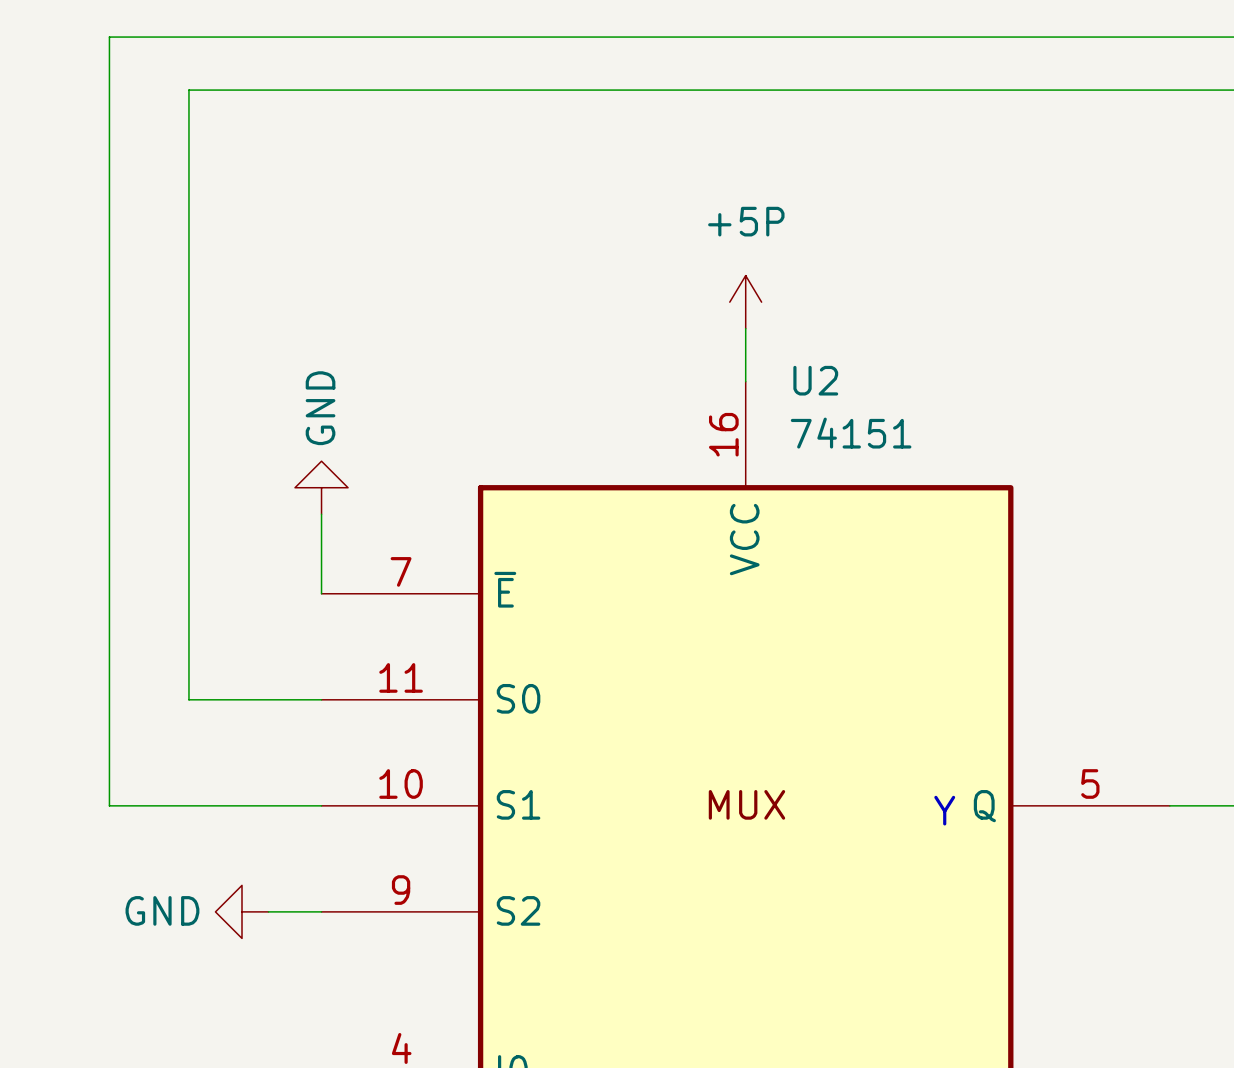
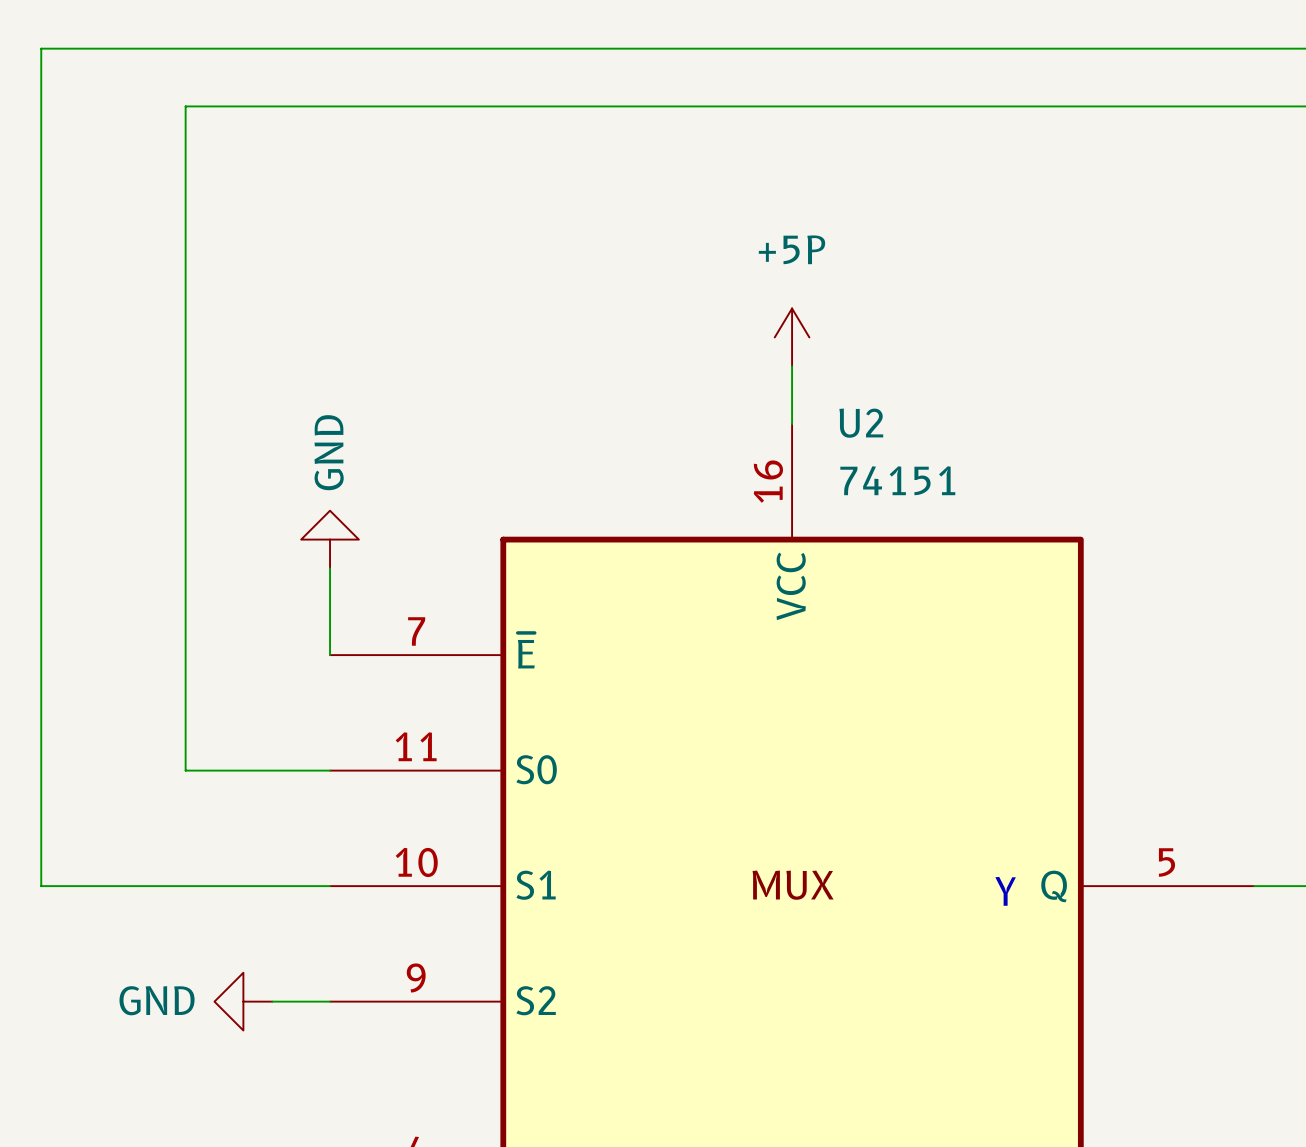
wire: (109, 37) (109, 805) -> (99, 48) (41, 48) (41, 886) (99, 886)

